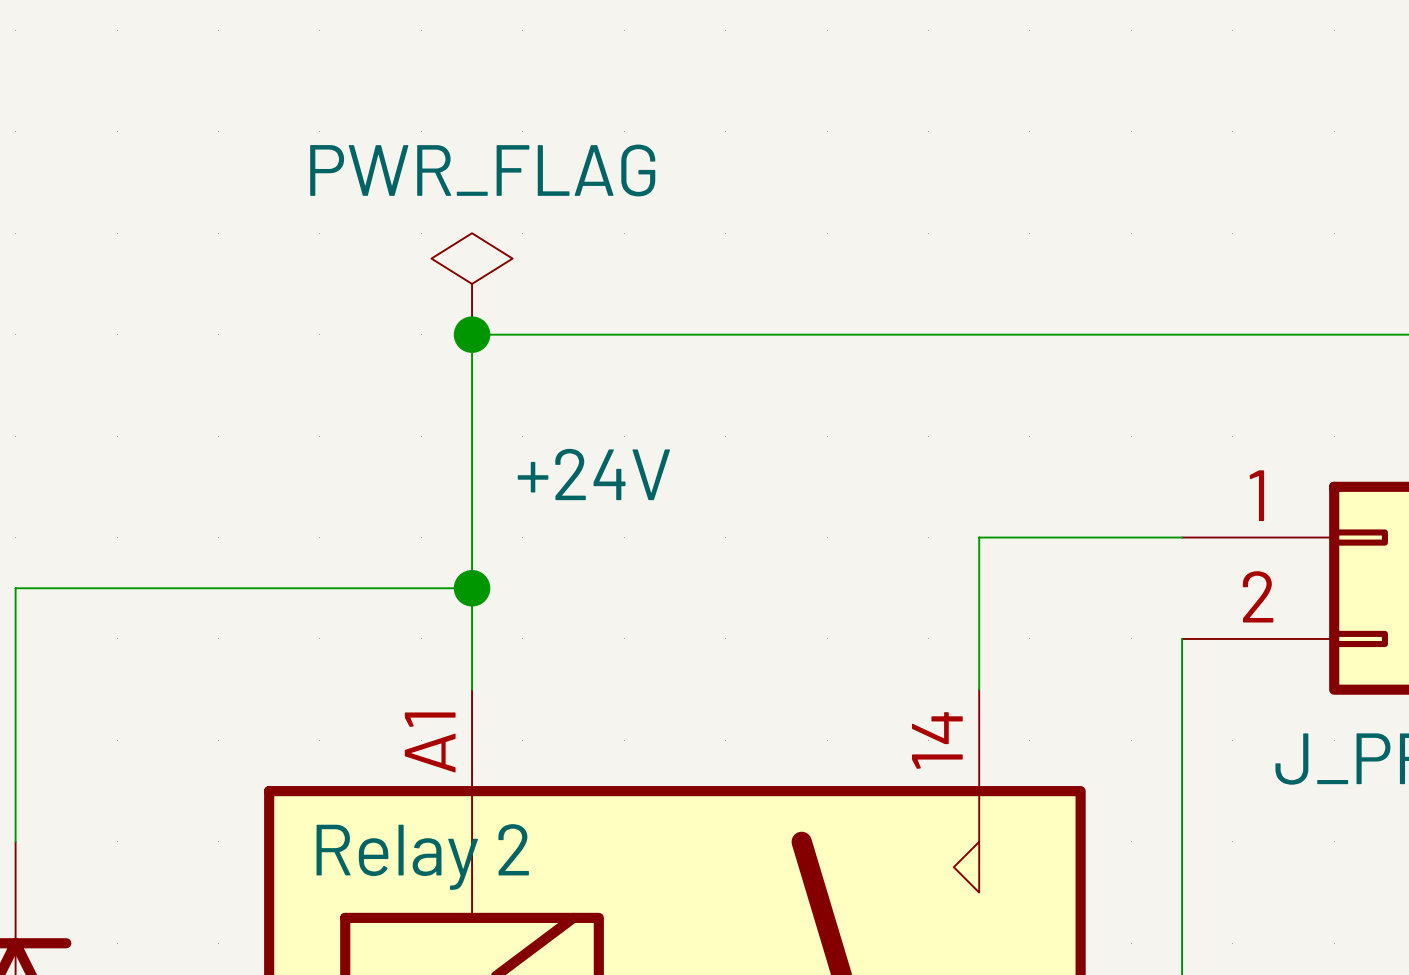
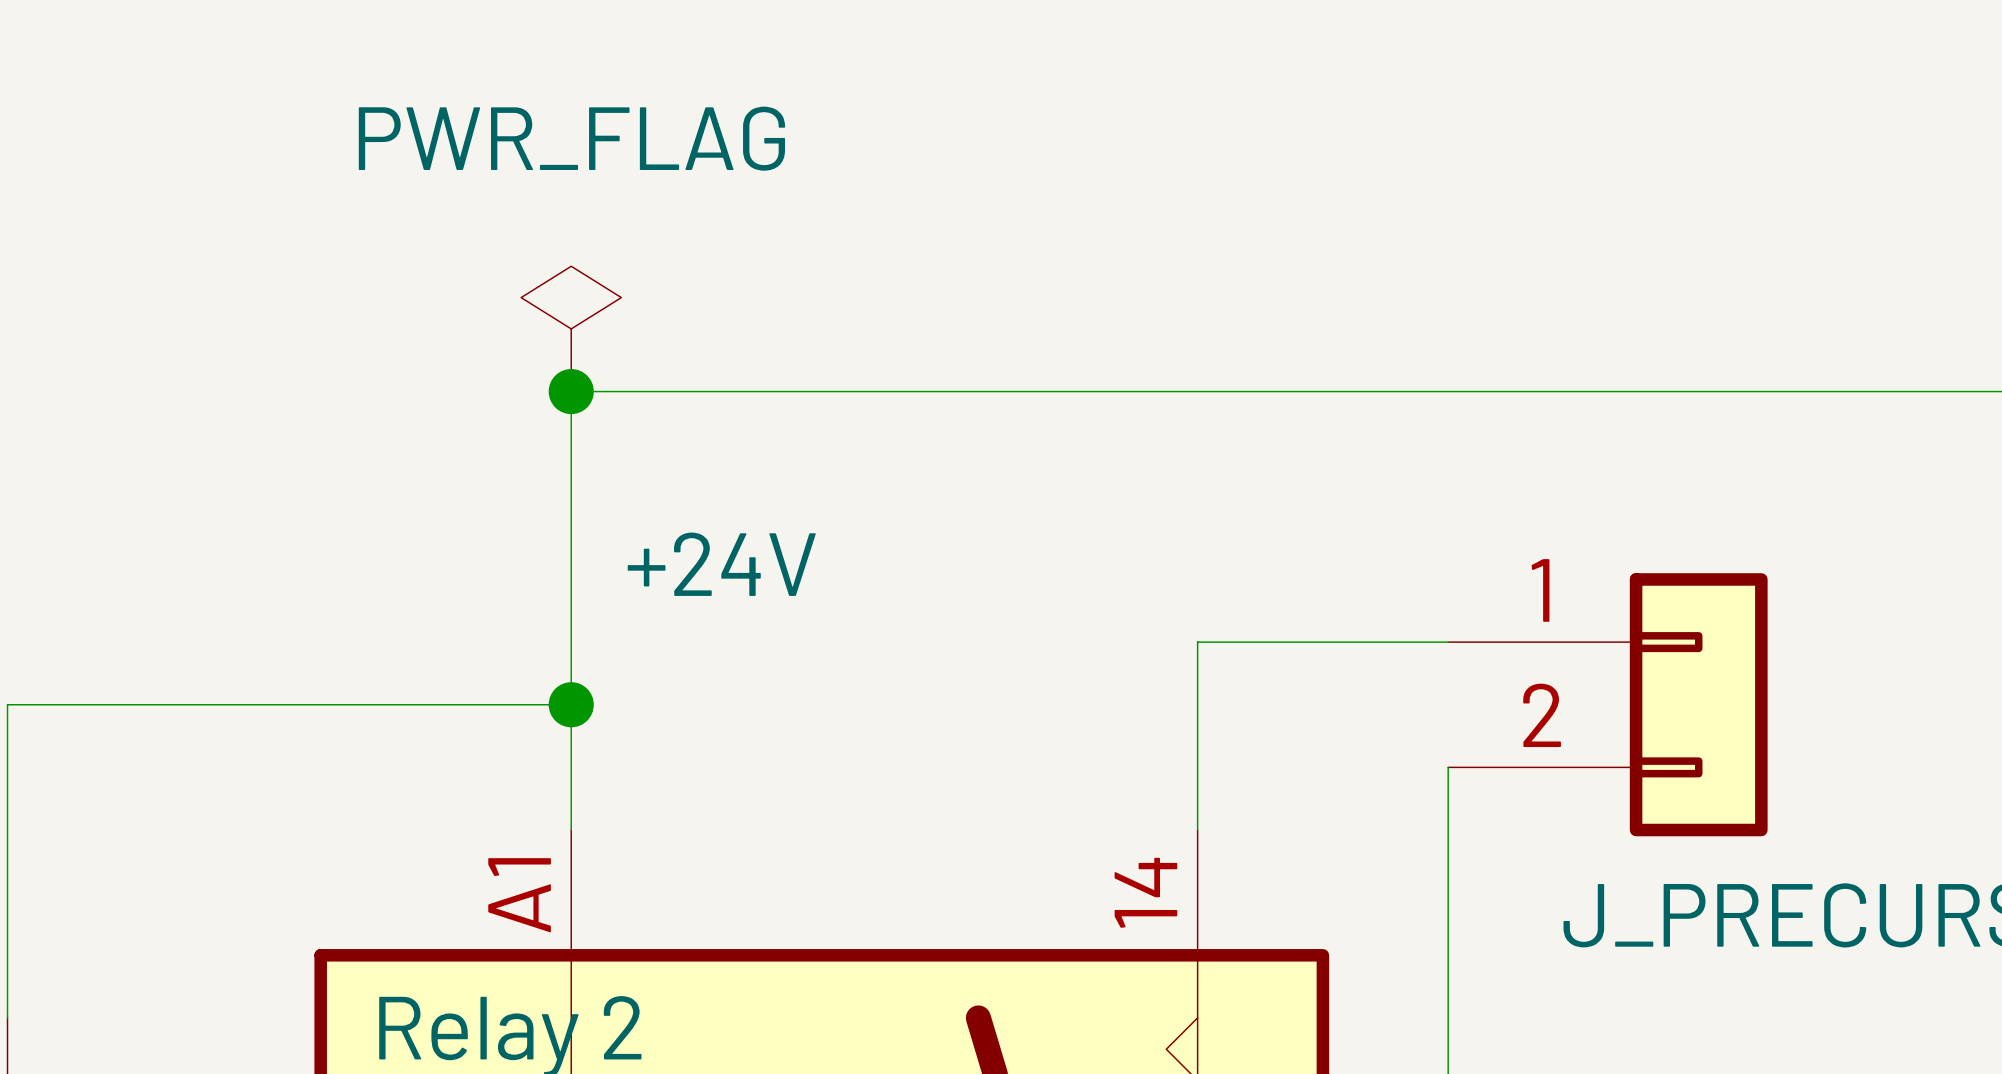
power symbol text position: PWR_FLAG (482, 170) -> PWR_FLAG (571, 138)

